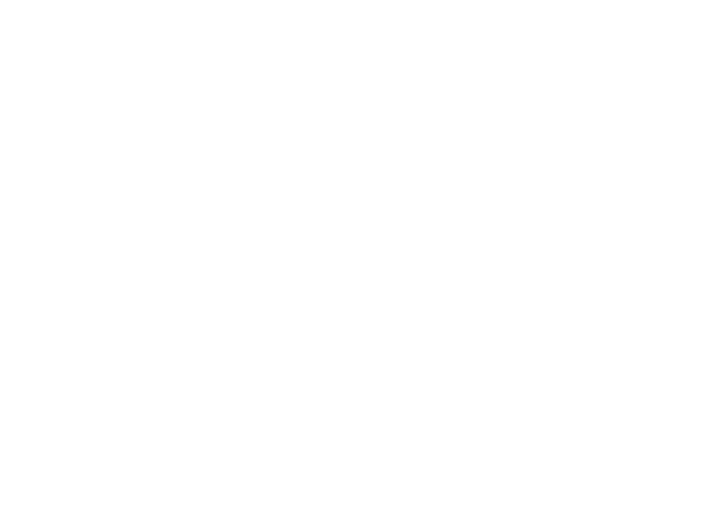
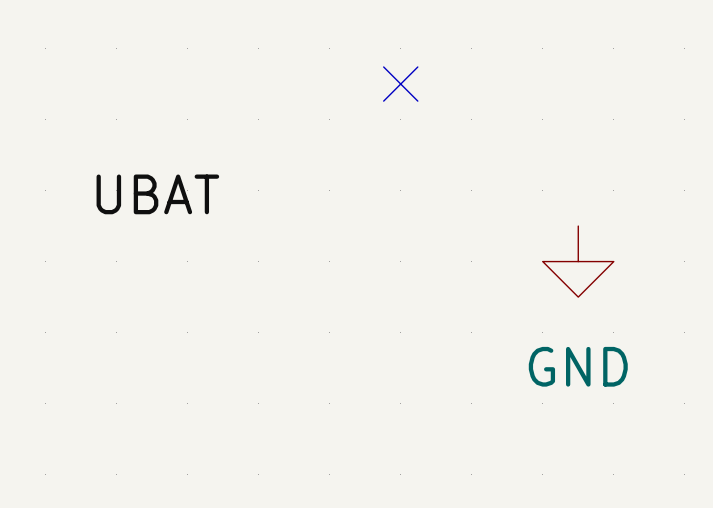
no-connect mark: none -> (400, 84)
label: none -> UBAT (157, 194)
power symbol: none -> GND (578, 261)

